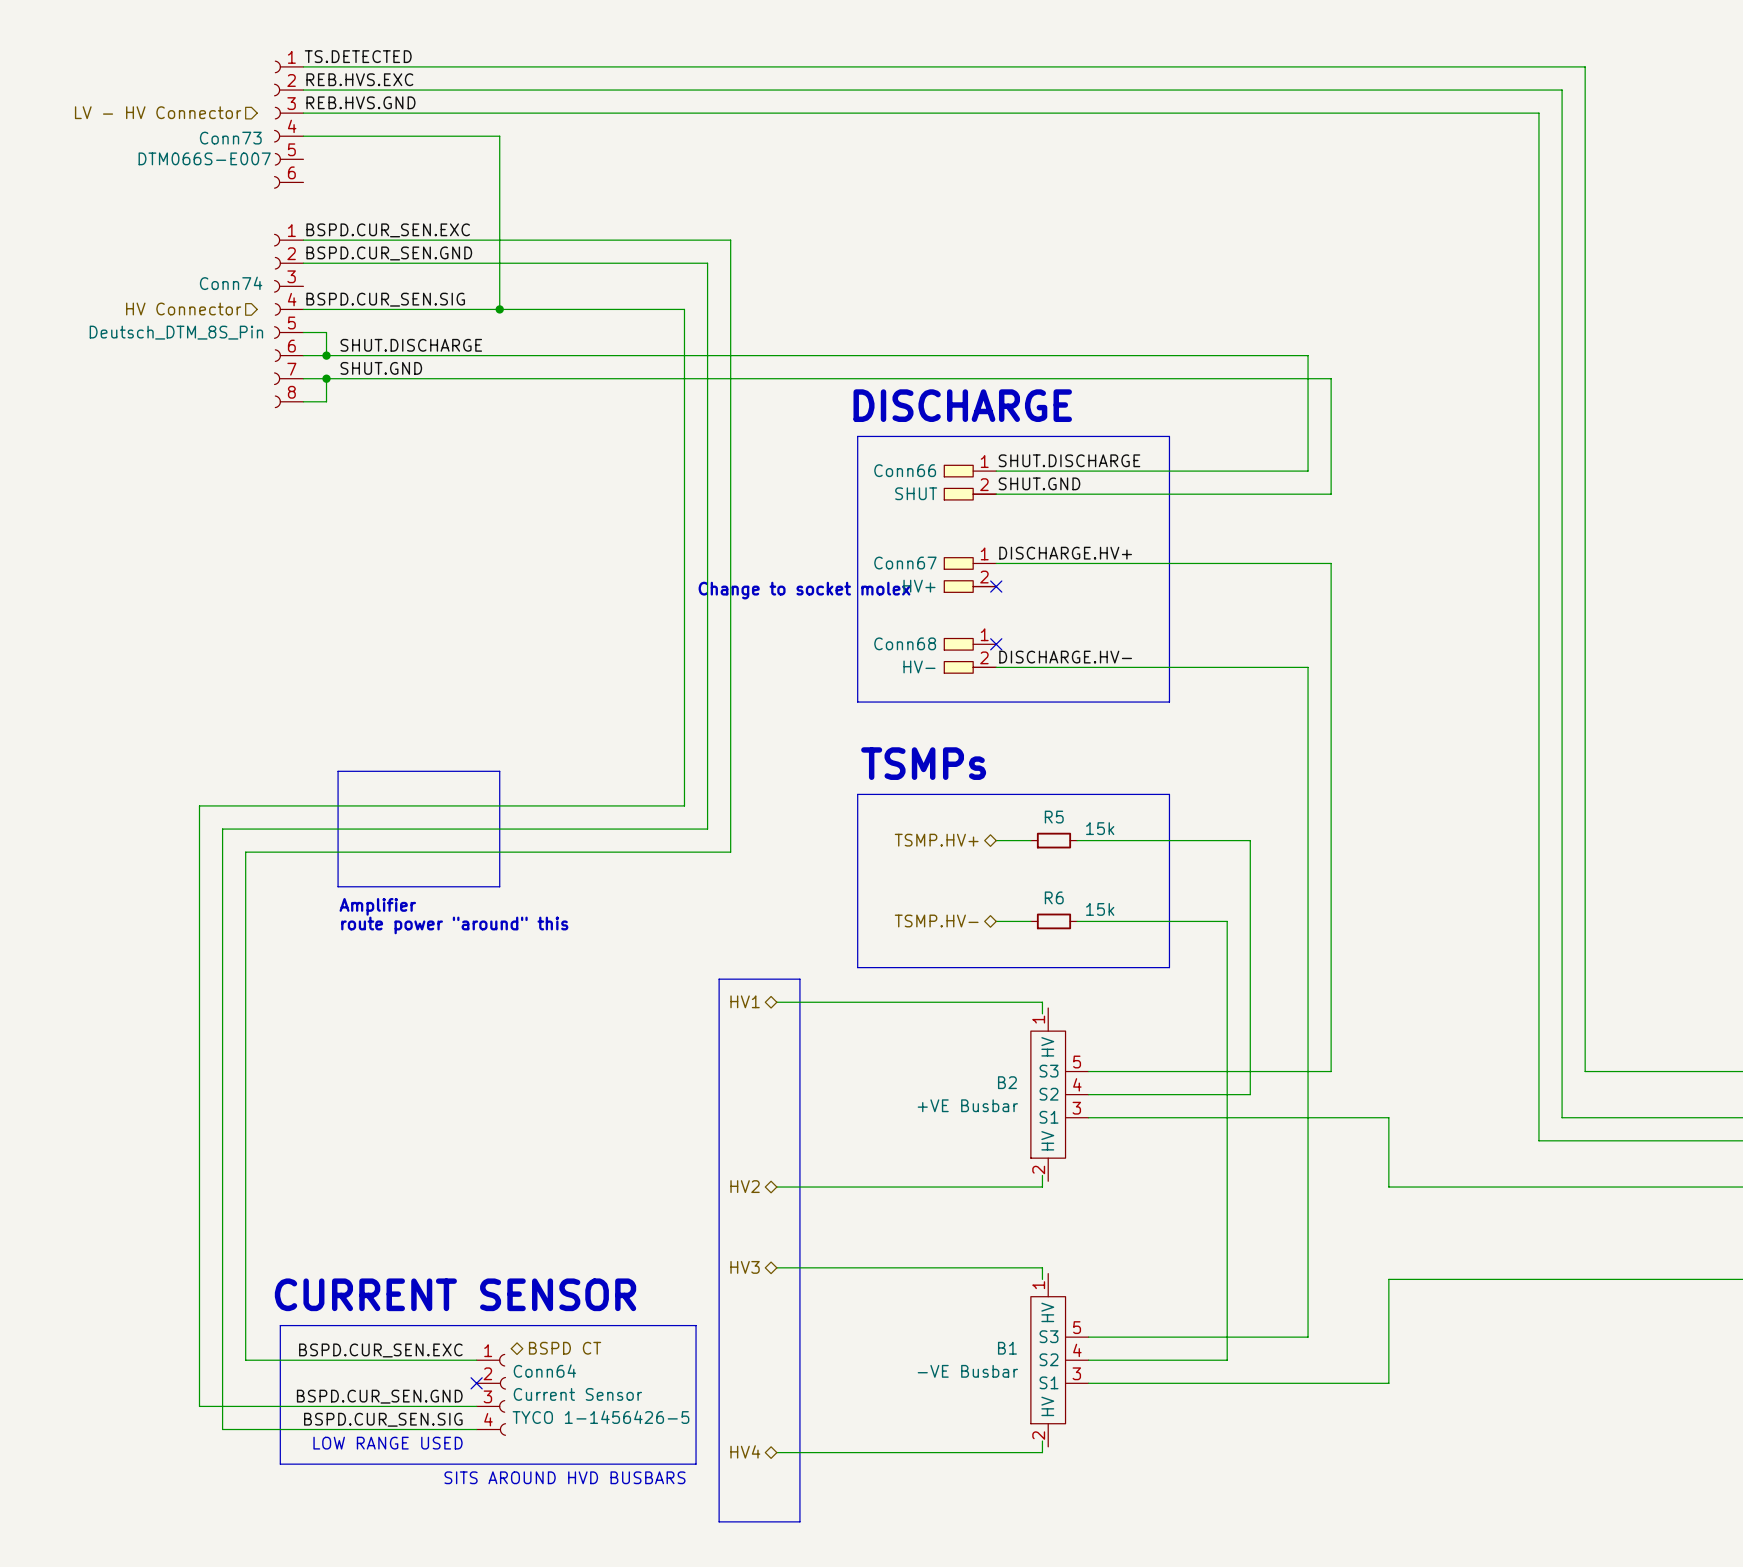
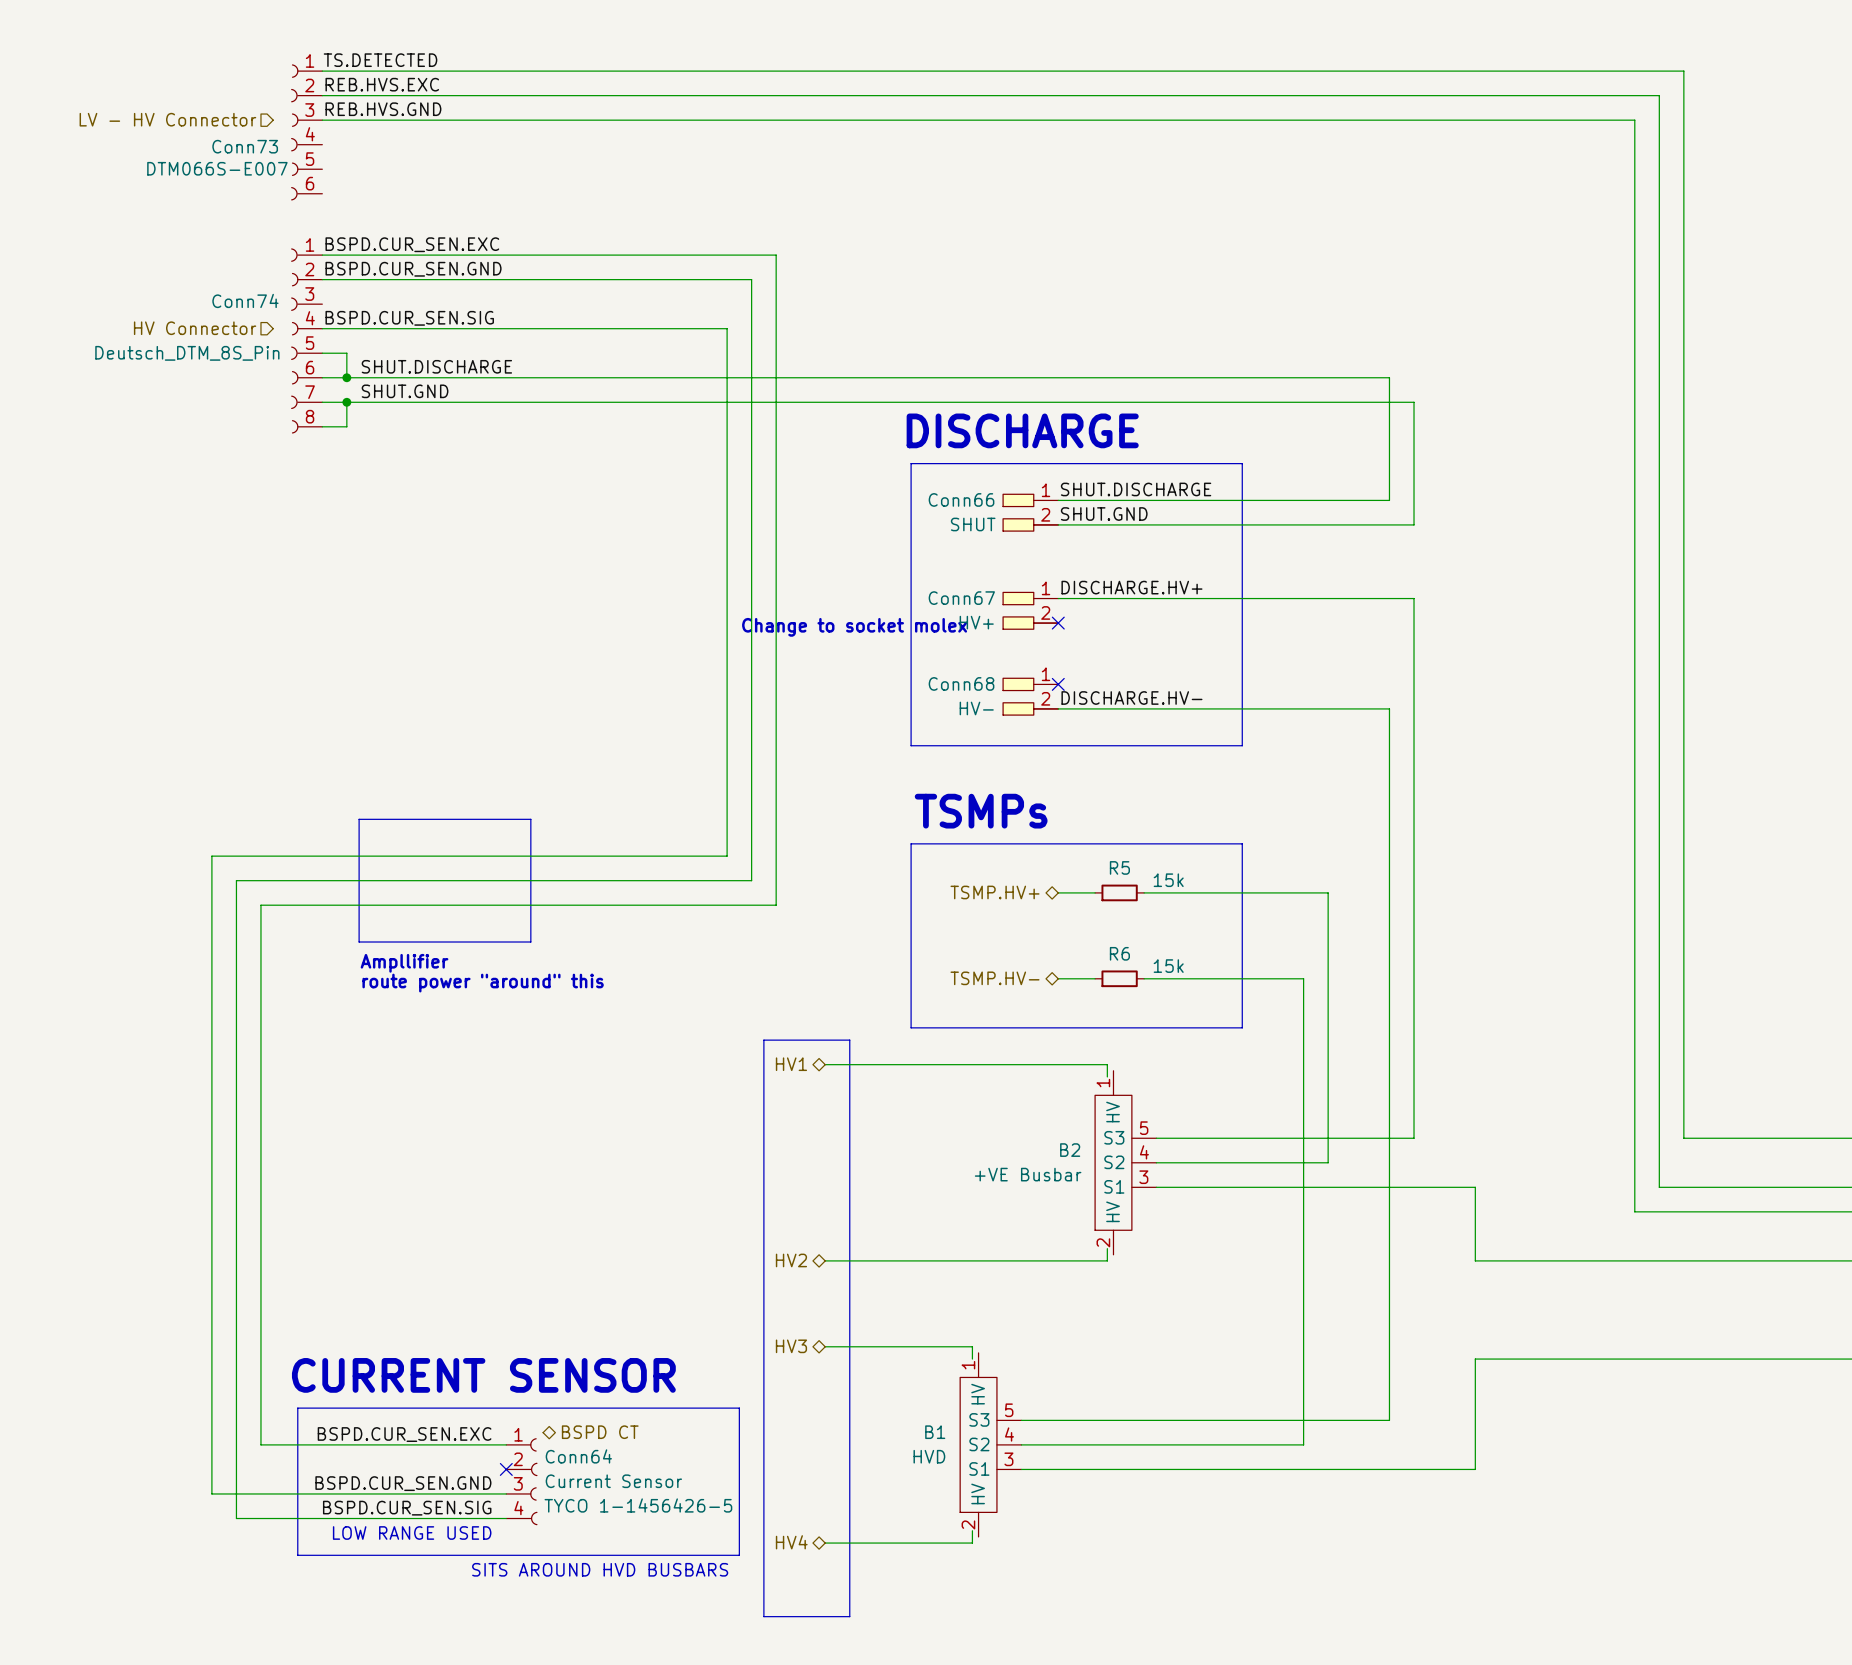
wire: (303, 136) (499, 136) (499, 309) -> none
junction: (499, 309) -> none
text: Amplifier (377, 906) -> Ampllifier (404, 963)
wire: (915, 1267) (1042, 1267) (1042, 1279) -> (972, 1346) (972, 1359)
wire: none -> (1021, 1420) (1156, 1420)
wire: none -> (1021, 1444) (1156, 1444)
B1 position: (1059, 1360) -> (990, 1444)
B1 value: -VE Busbar (967, 1371) -> HVD (929, 1456)
wire: none -> (1021, 1469) (1156, 1469)
wire: (1042, 1441) (1042, 1452) (915, 1452) -> (972, 1530) (972, 1543)

